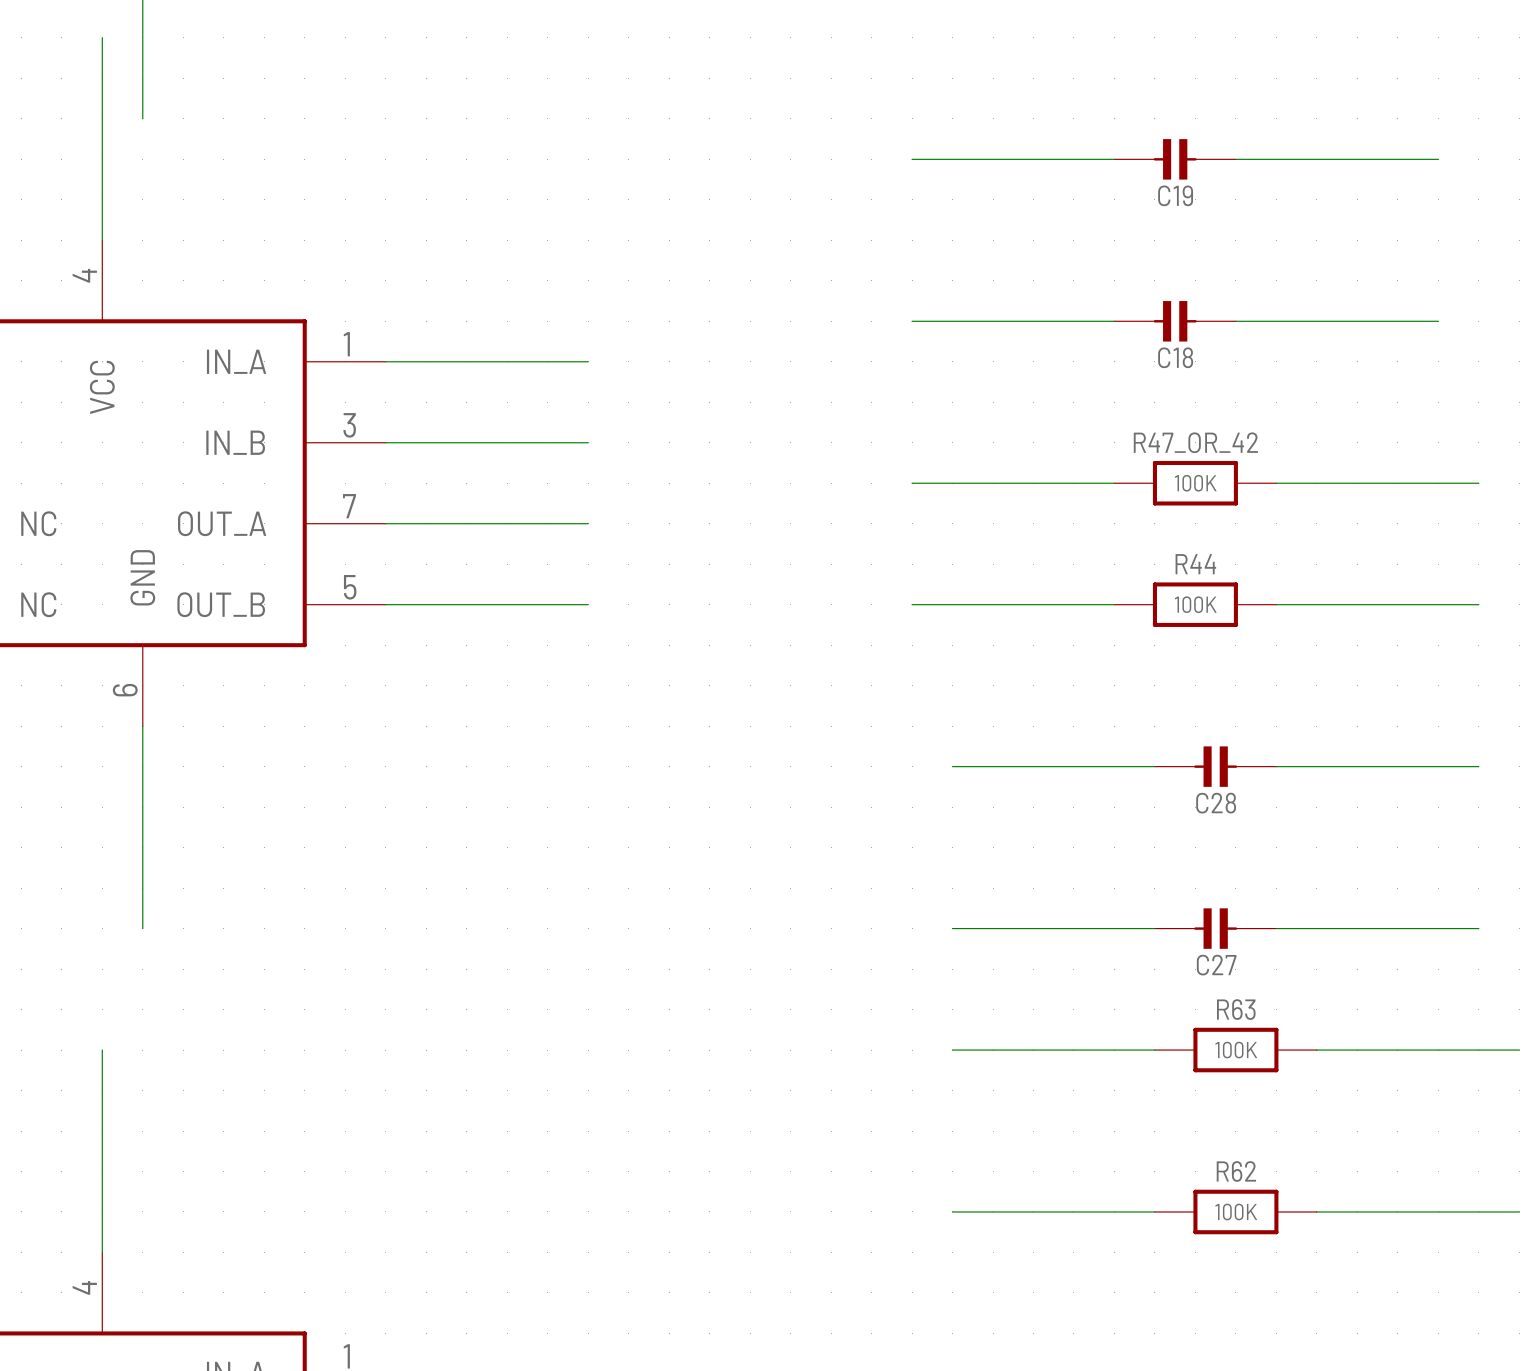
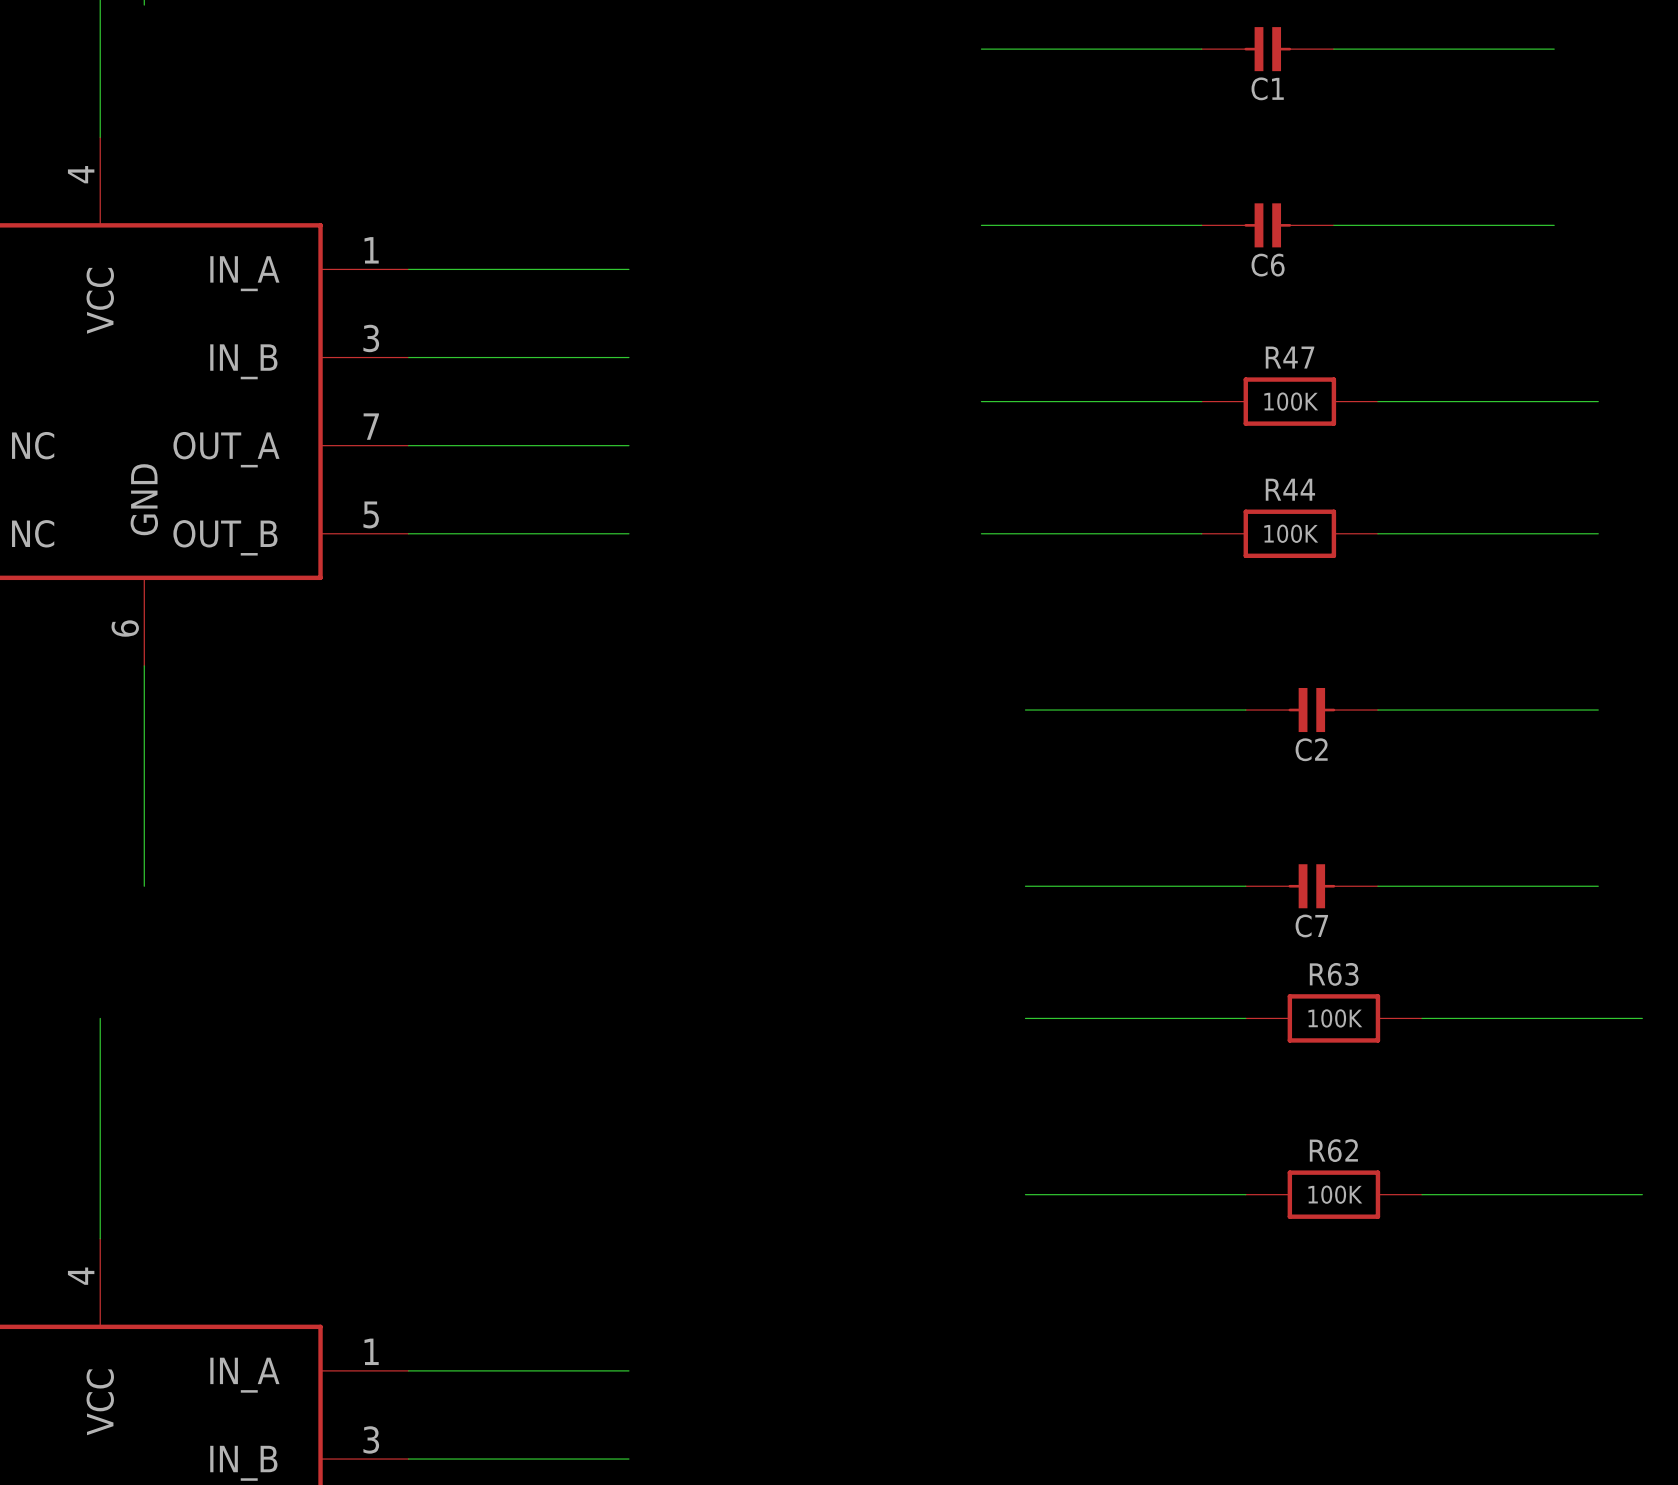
C19 name: C19 (1175, 195) -> C1 (1267, 88)
C18 name: C18 (1175, 357) -> C6 (1268, 265)
R47_OR_42 name: R47_OR_42 (1195, 442) -> R47 (1290, 357)
C28 name: C28 (1216, 803) -> C2 (1311, 749)
C27 name: C27 (1216, 965) -> C7 (1311, 925)

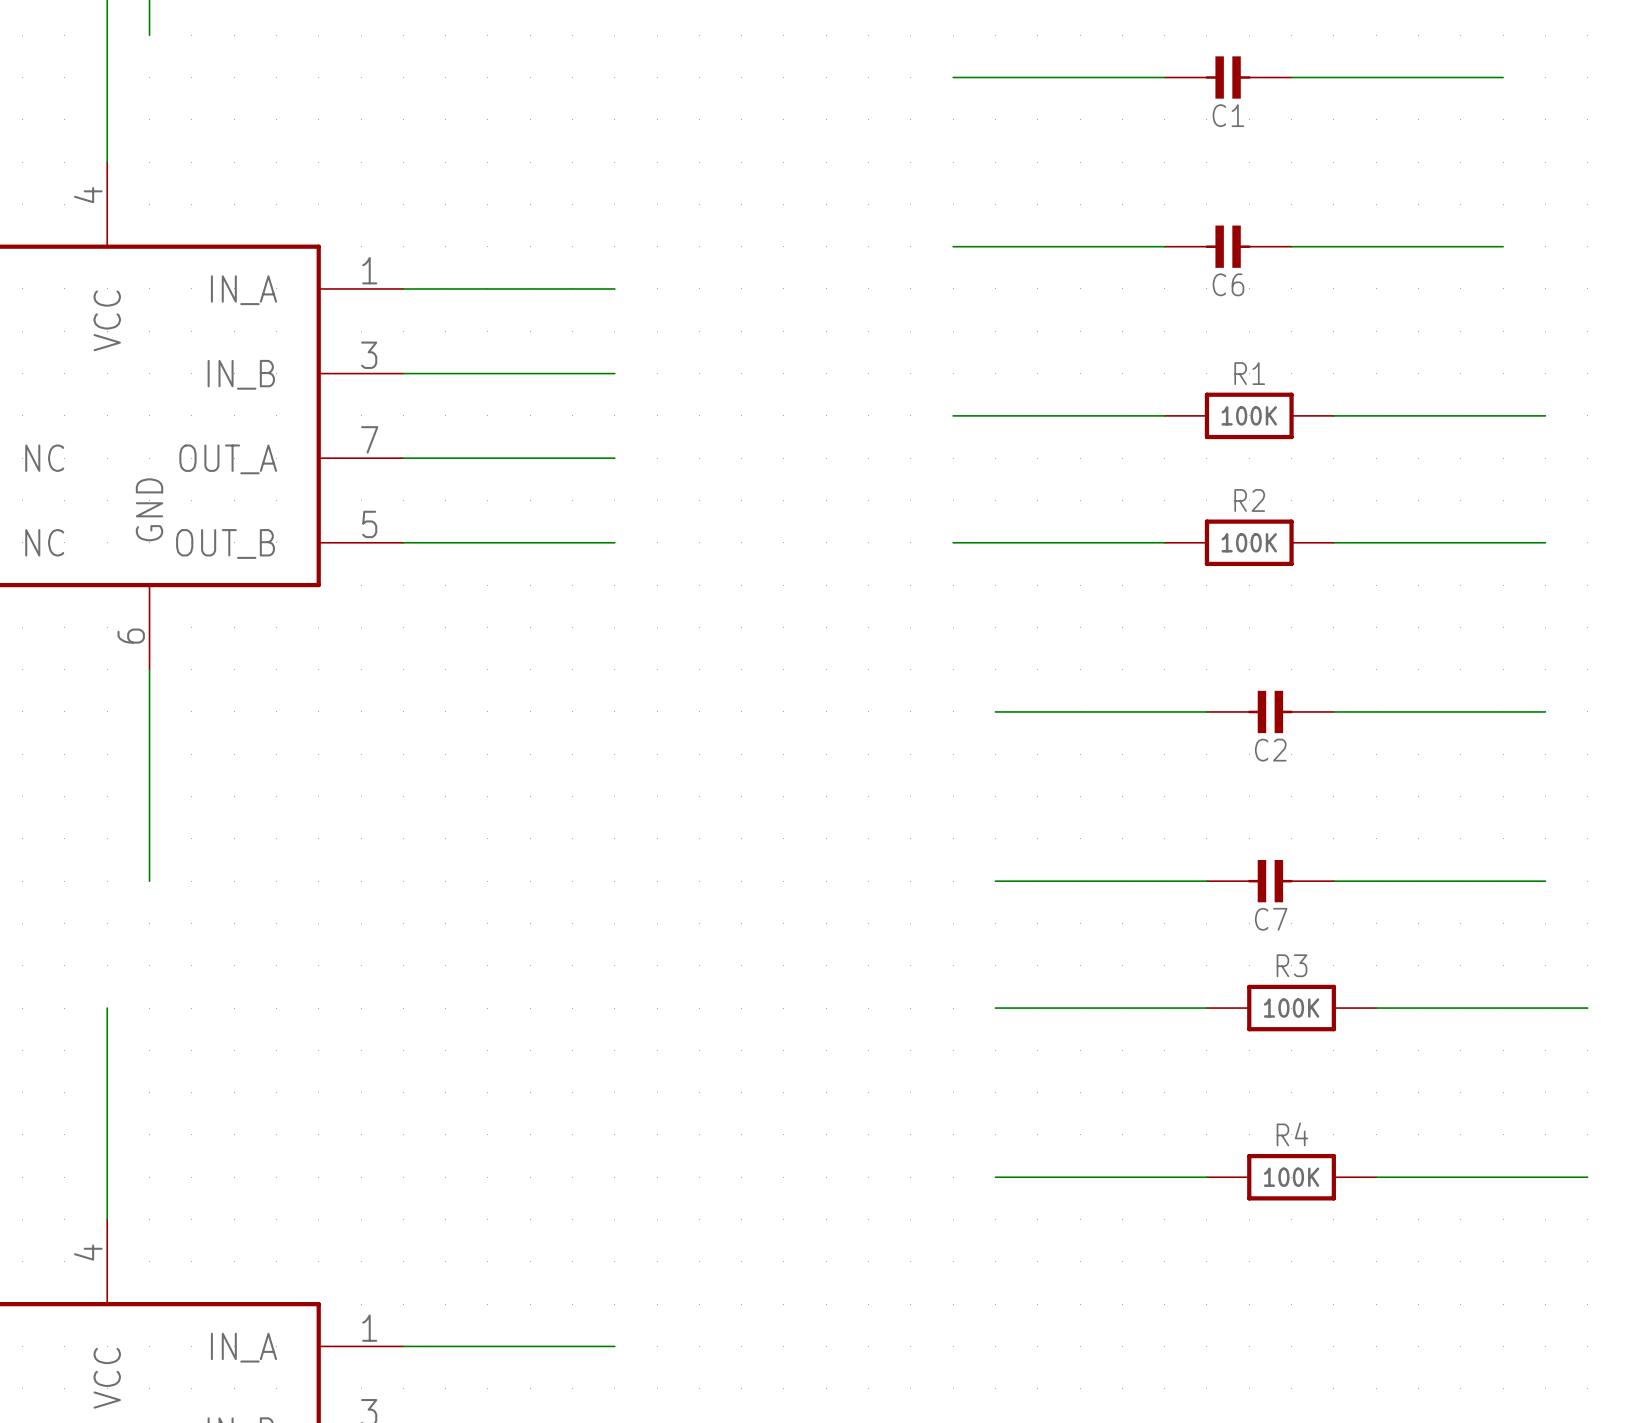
R47 name: R47 (1290, 357) -> R1 (1249, 373)
R44 name: R44 (1290, 489) -> R2 (1249, 500)
R63 name: R63 (1334, 974) -> R3 (1292, 965)
R62 name: R62 (1333, 1150) -> R4 (1292, 1134)

